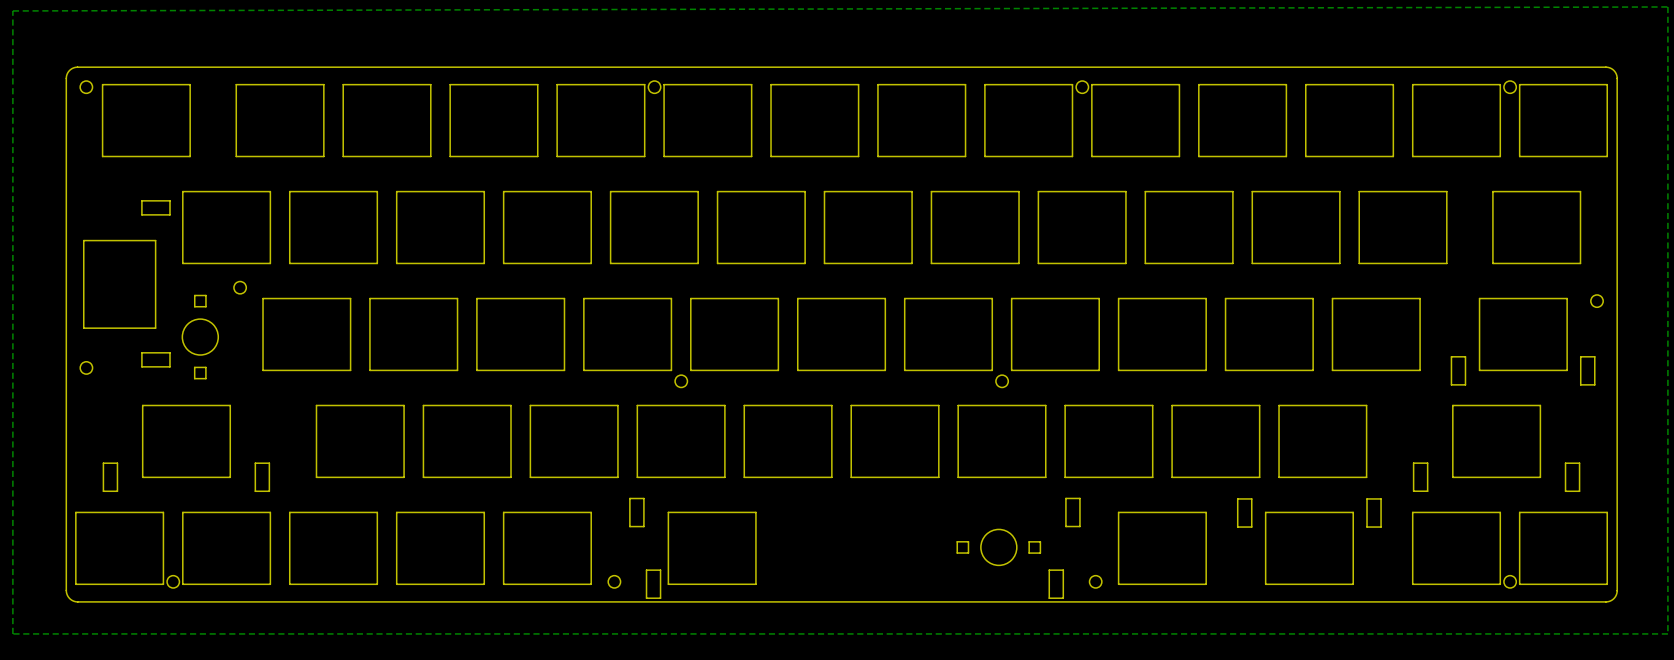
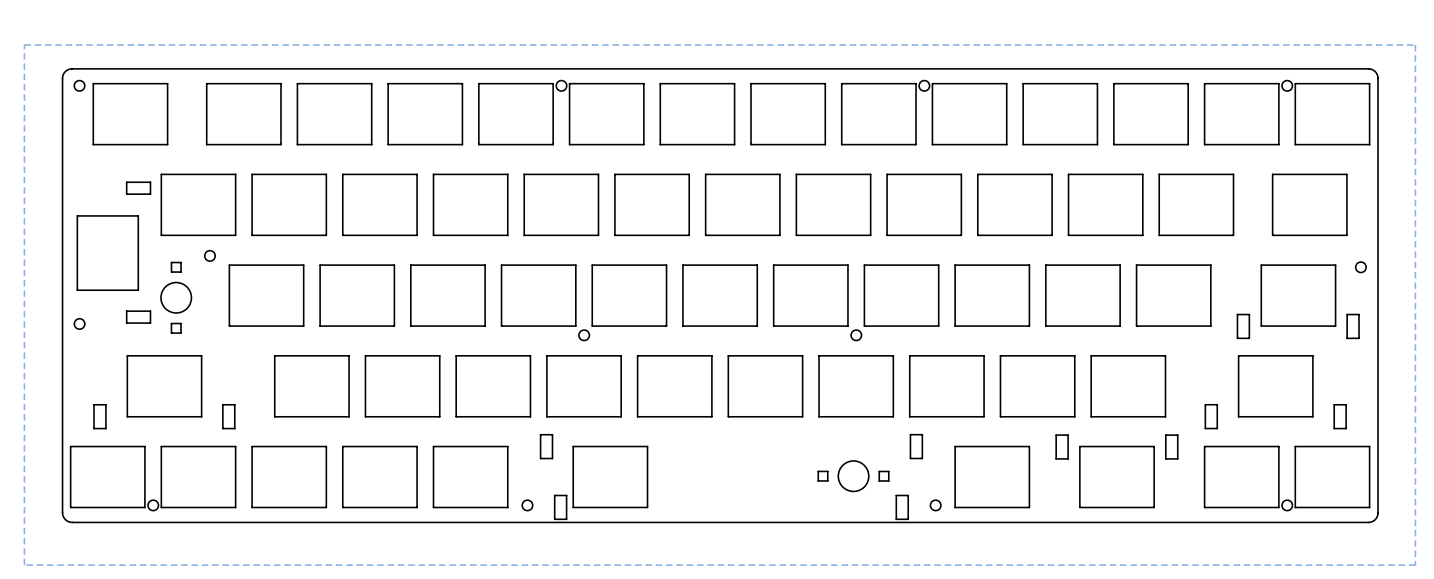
zone outline: (1667, 6) (1667, 633) (12, 633) (12, 10) (1667, 6) -> (1415, 45) (1415, 565) (24, 565) (24, 45) (1415, 45)

